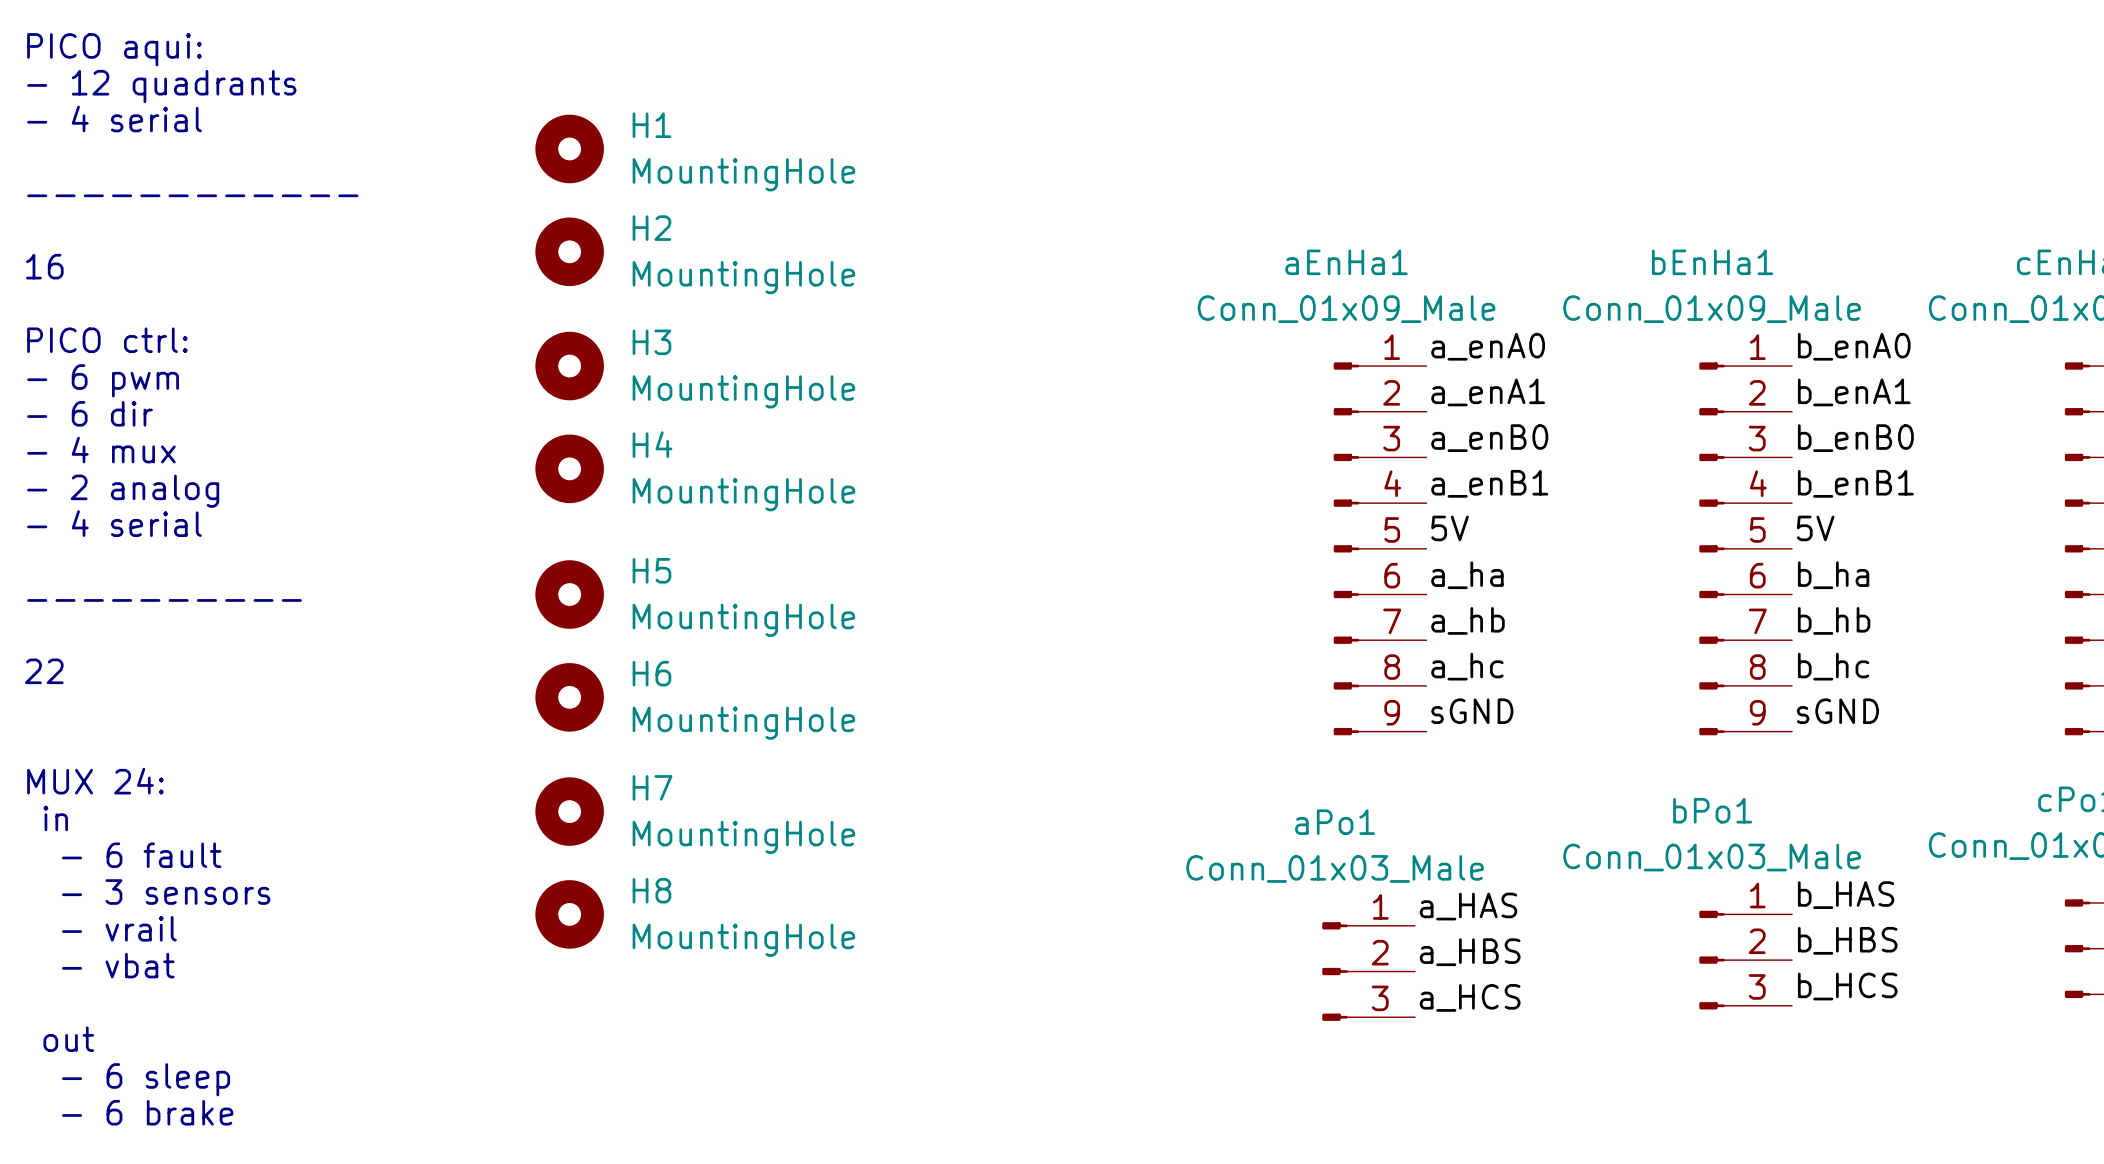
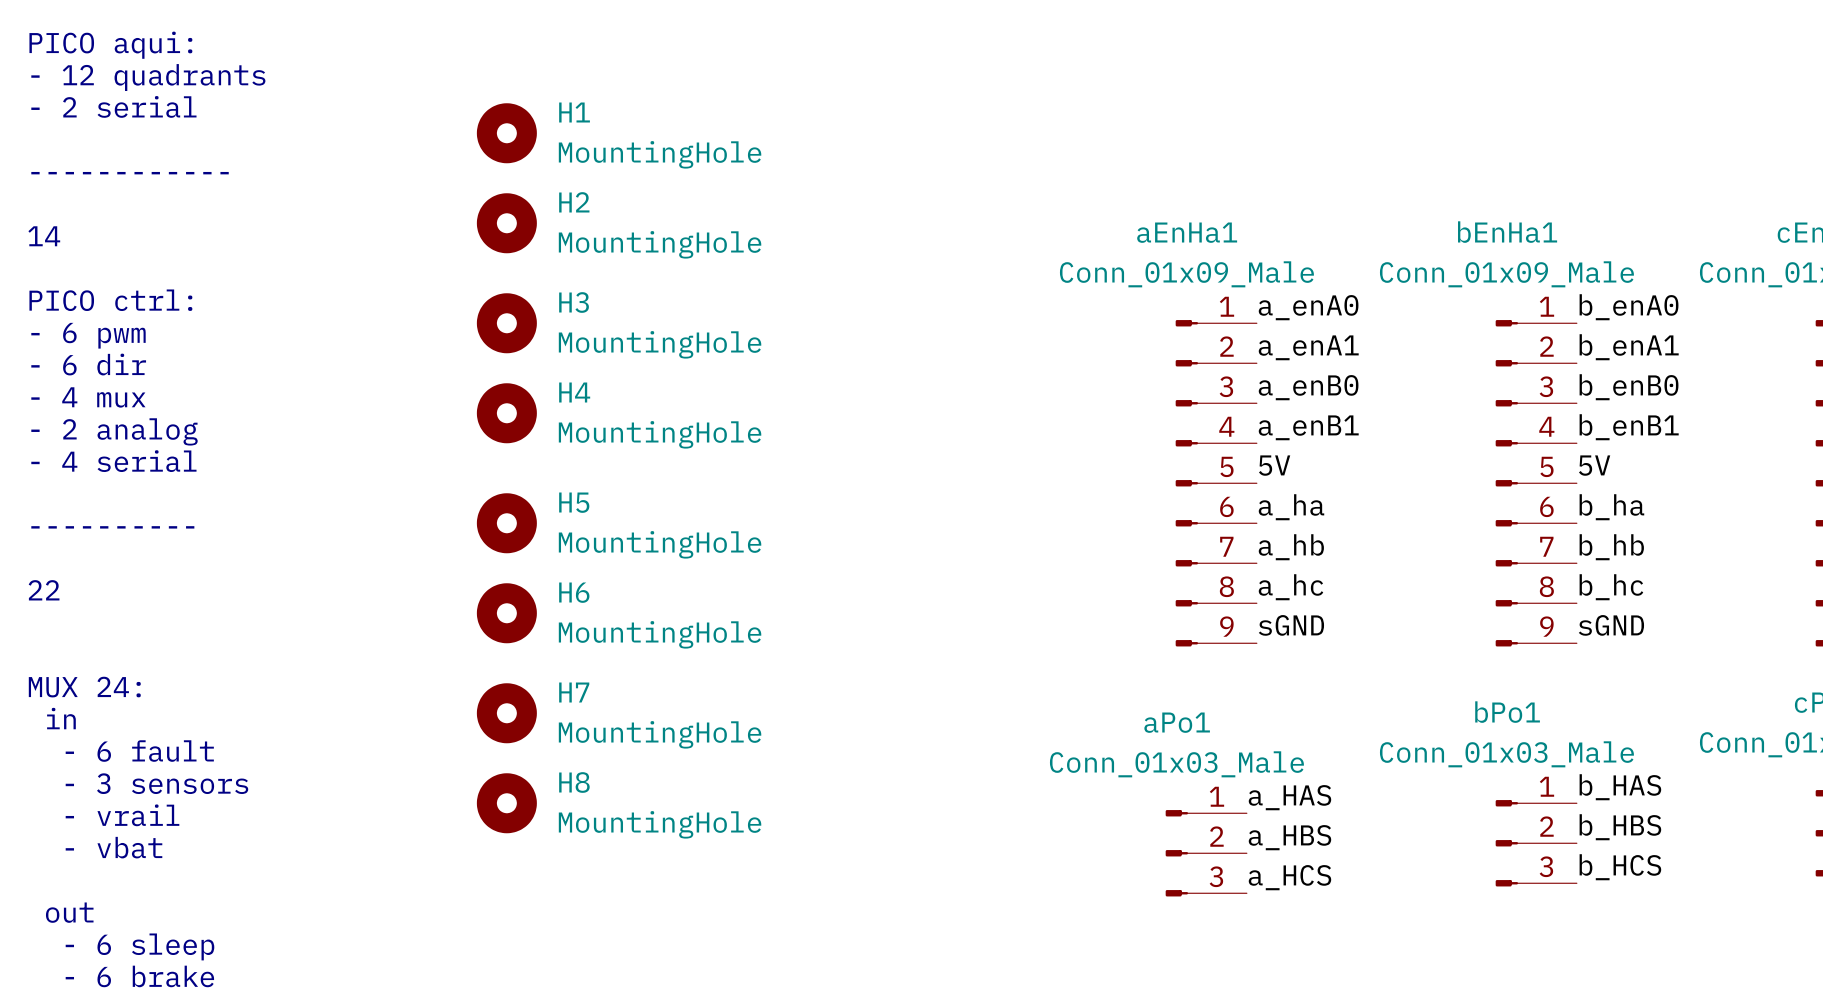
text: - 4 serial (114, 118) -> - 2 serial (113, 106)
text: 16 (44, 266) -> 14 (44, 236)

